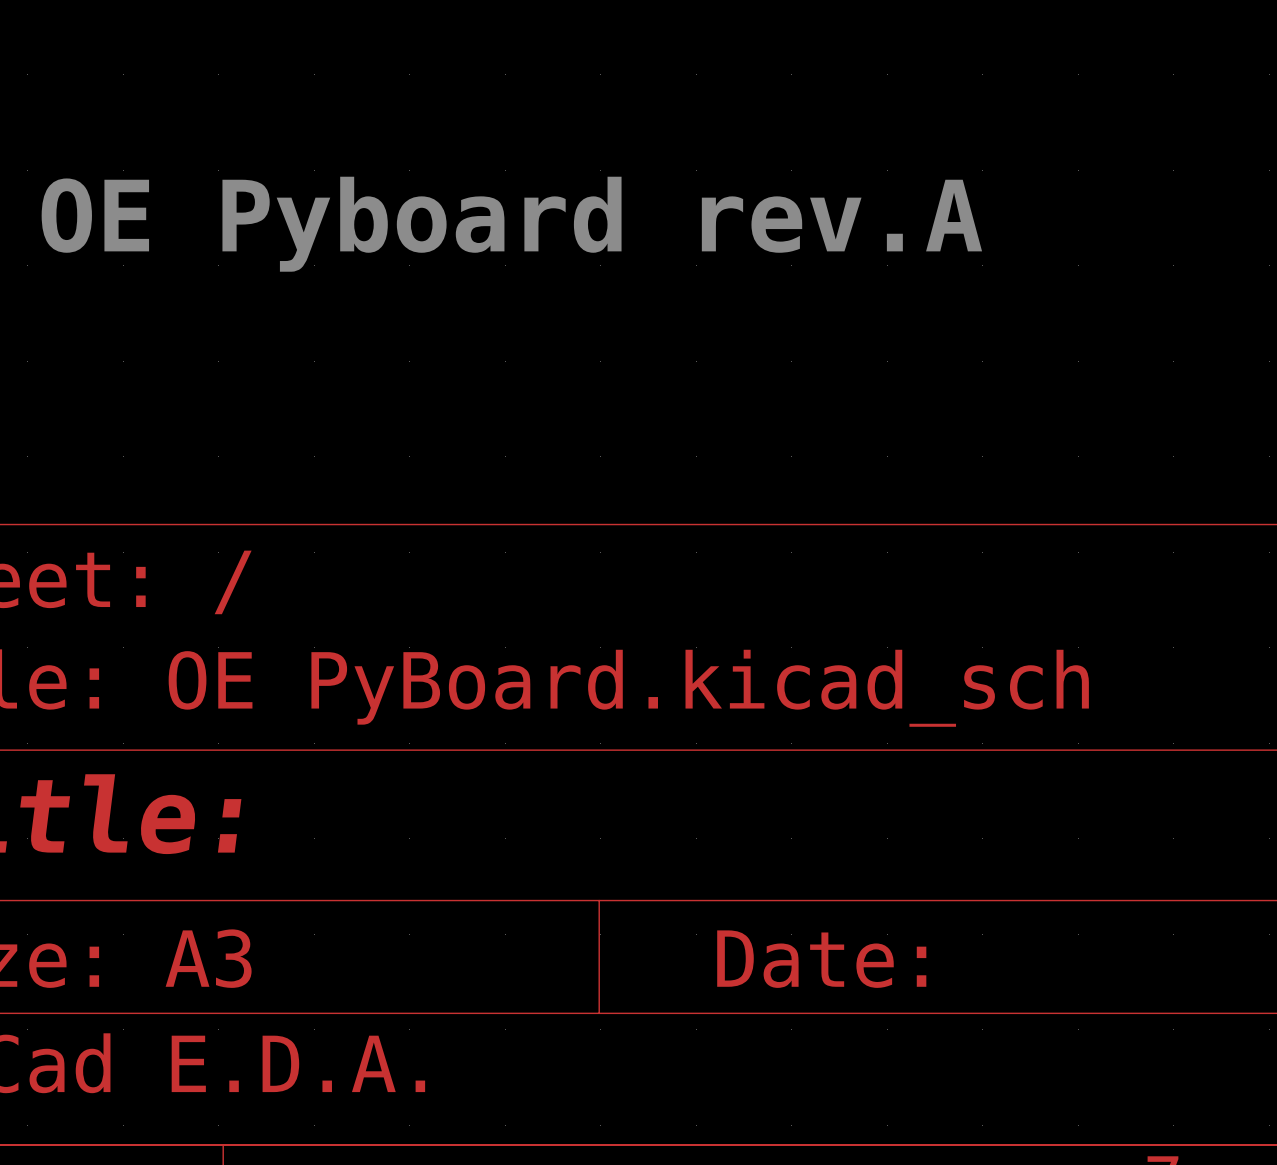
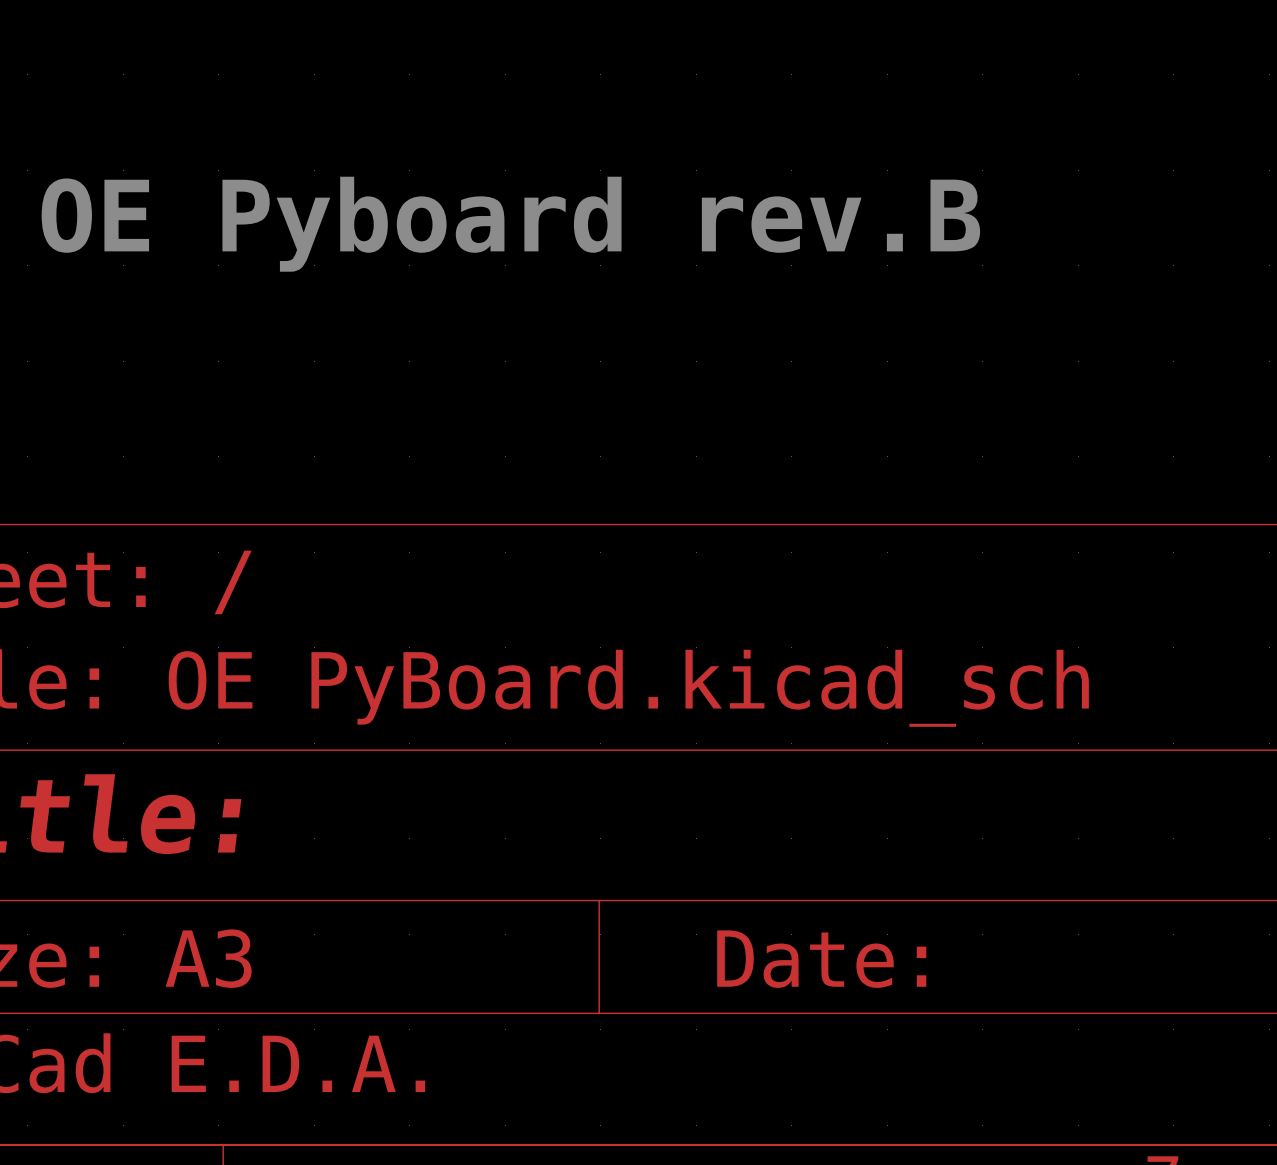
text: OE Pyboard rev.A (511, 224) -> OE Pyboard rev.B (510, 224)

